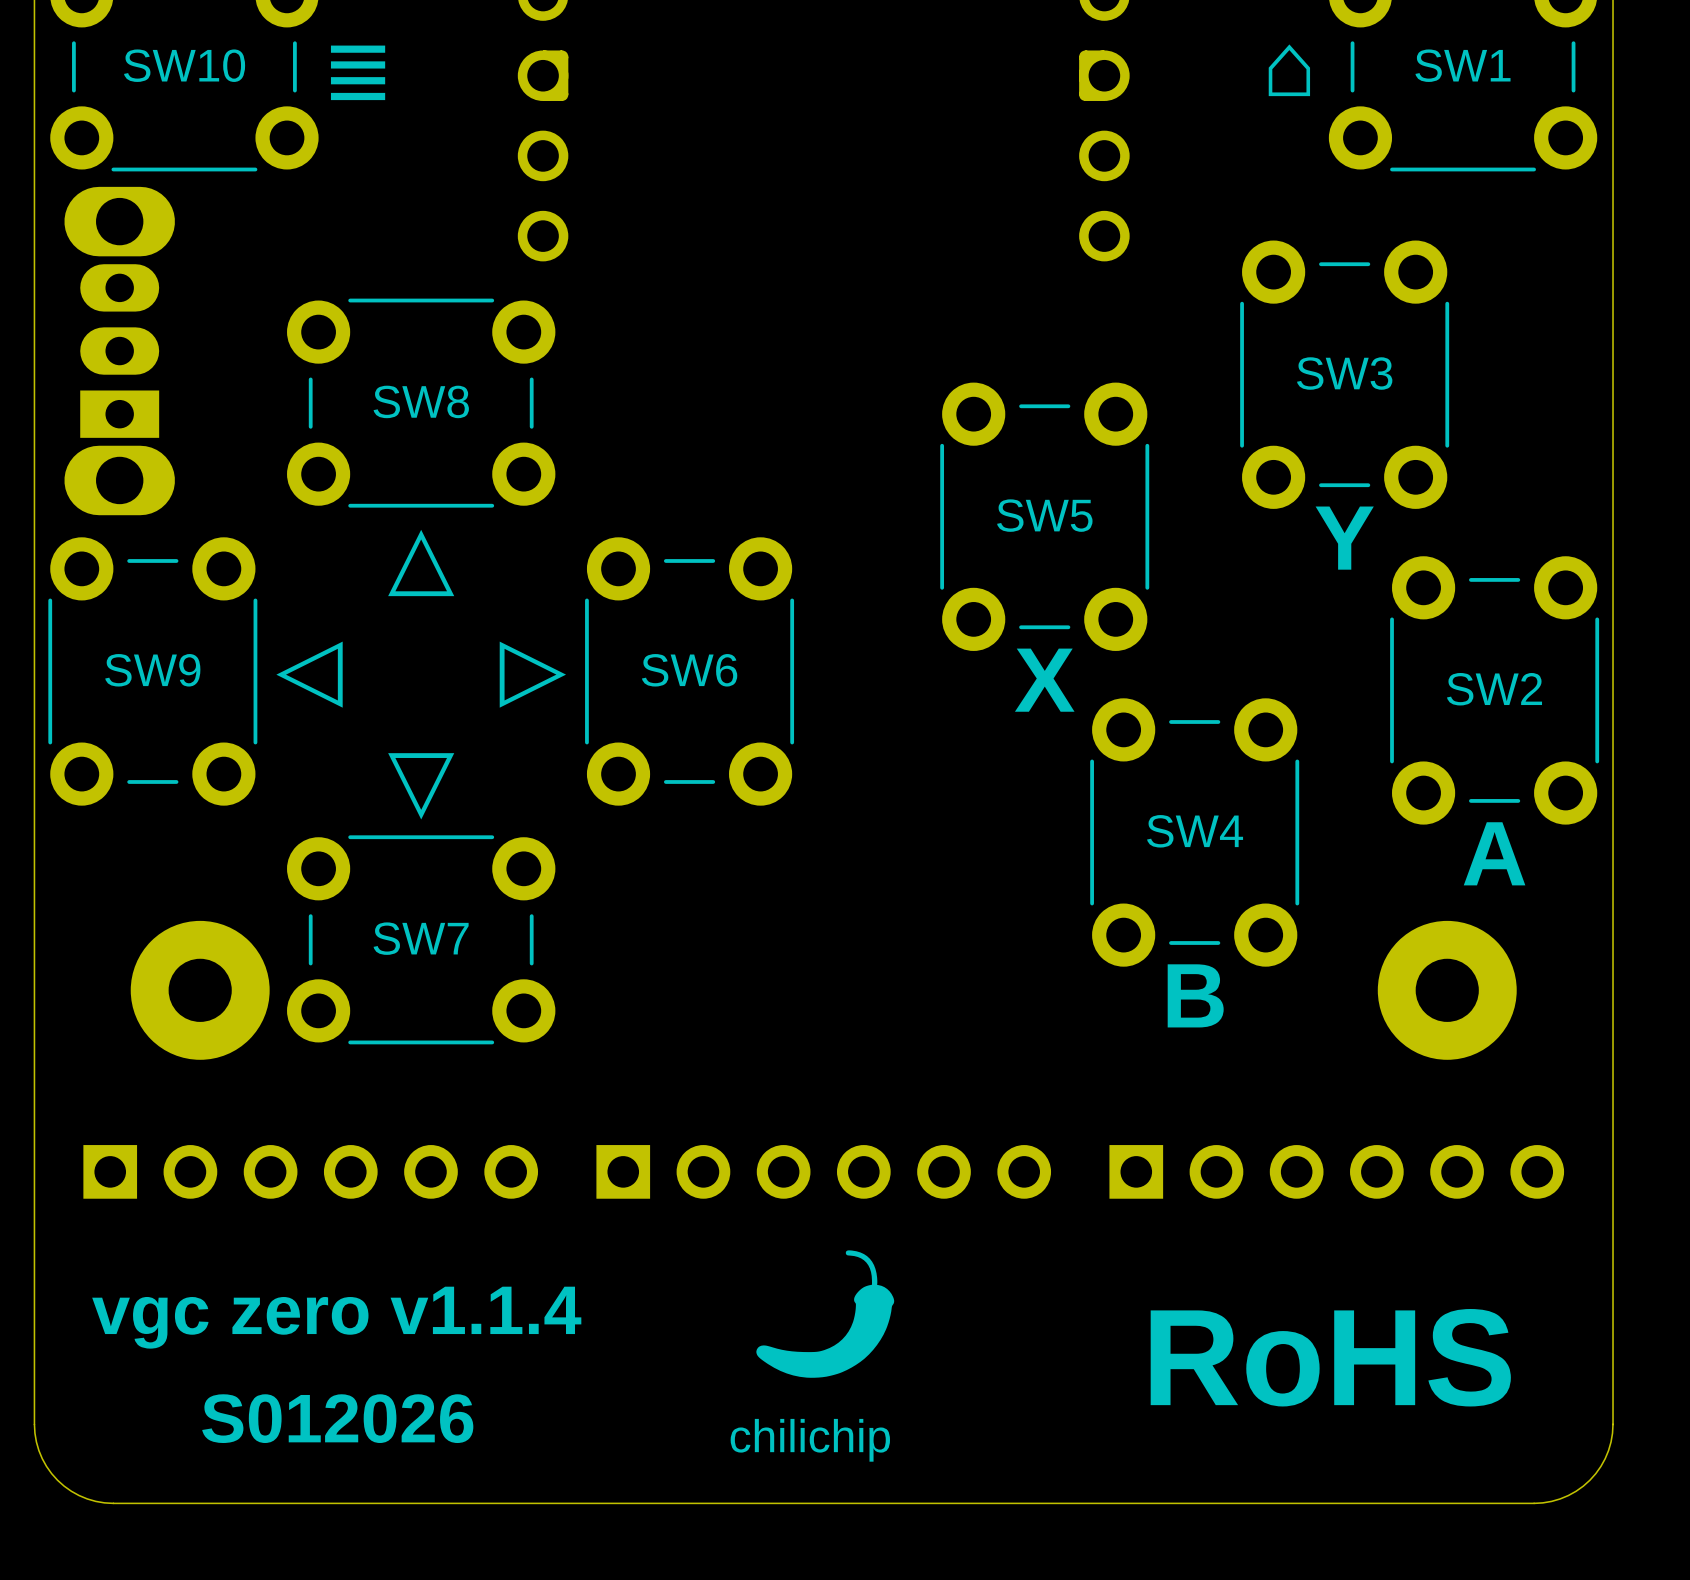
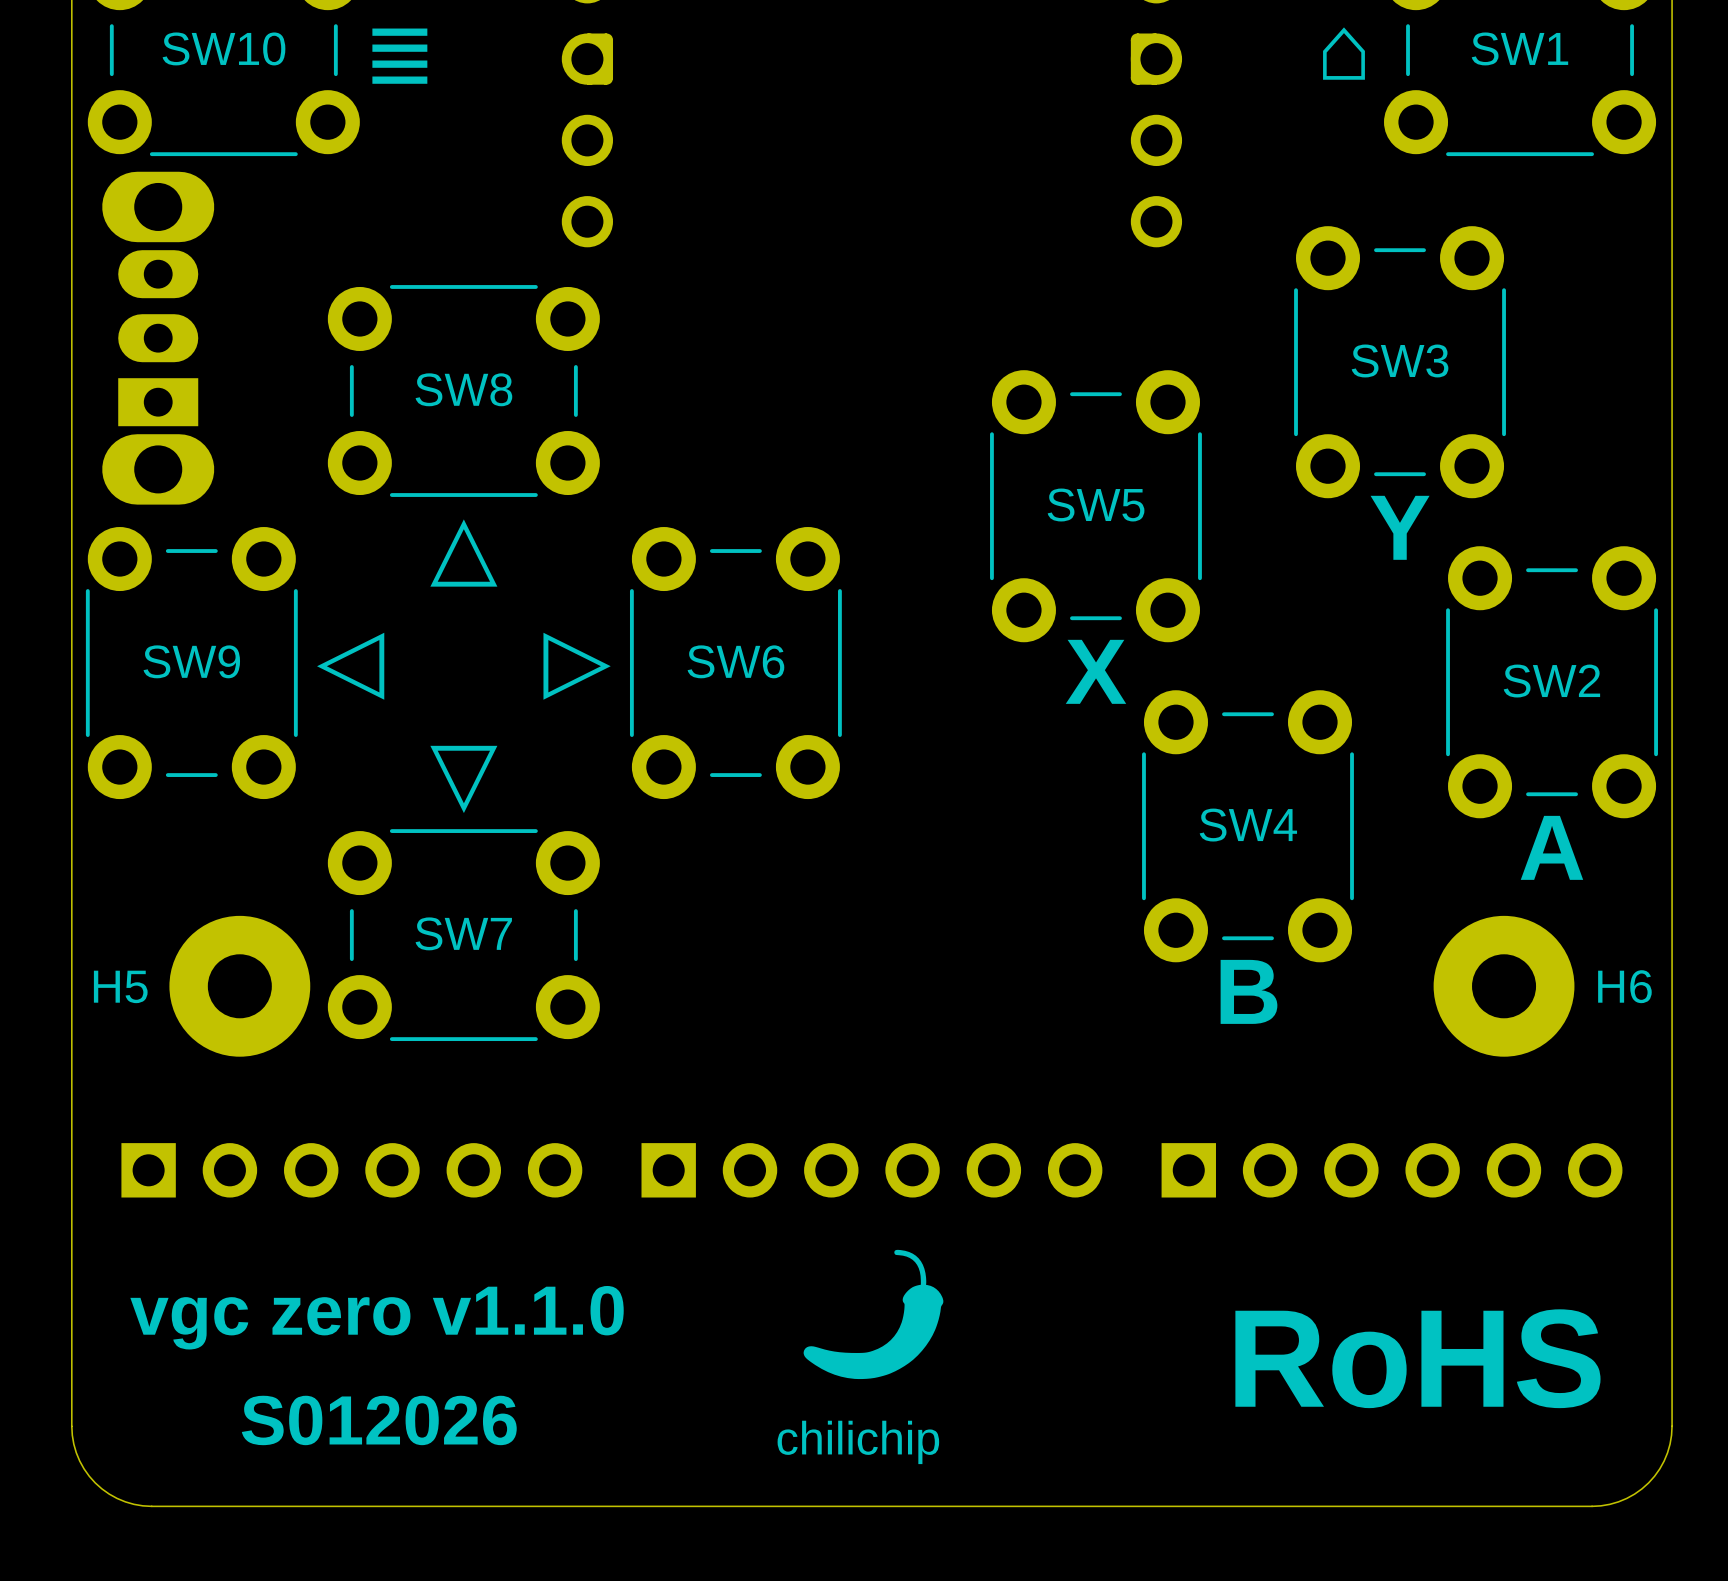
H5 name: none -> H5 (120, 986)
H6 name: none -> H6 (1624, 986)
text: vgc zero v1.1.4 (336, 1317) -> vgc zero v1.1.0 (377, 1317)
text position: RoHS (1330, 1357) -> RoHS (1417, 1358)

